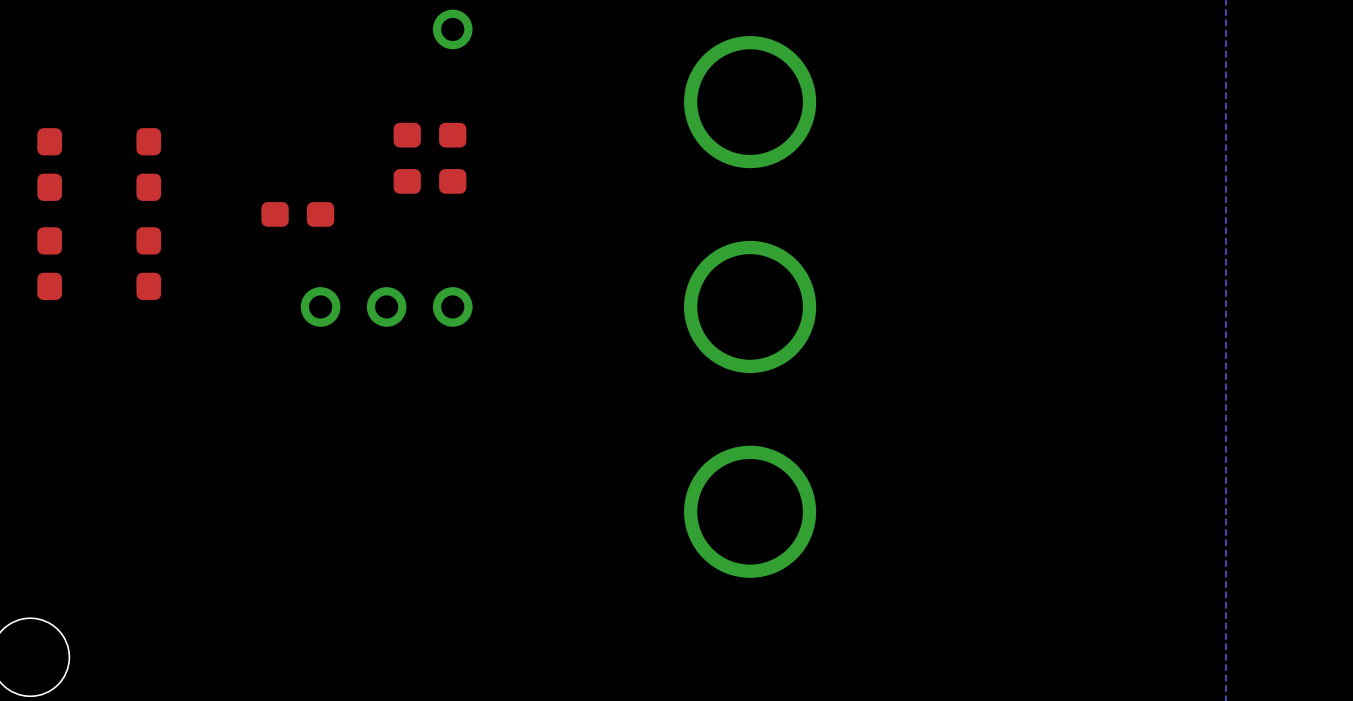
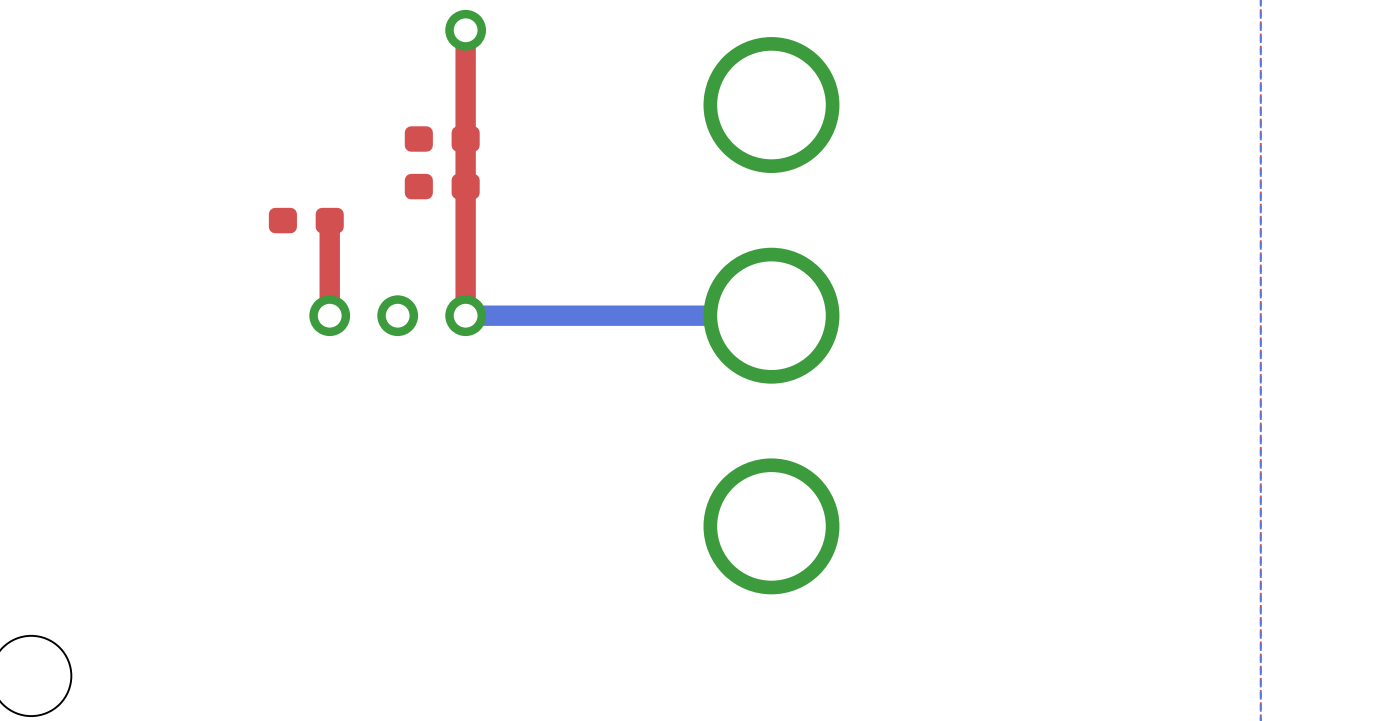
top track: none -> (465, 30) (465, 315)
part: (49, 164) -> none
part: (148, 164) -> none
top track: none -> (329, 220) (329, 315)
part: (49, 263) -> none
part: (148, 263) -> none
bottom track: none -> (771, 315) (465, 315)

